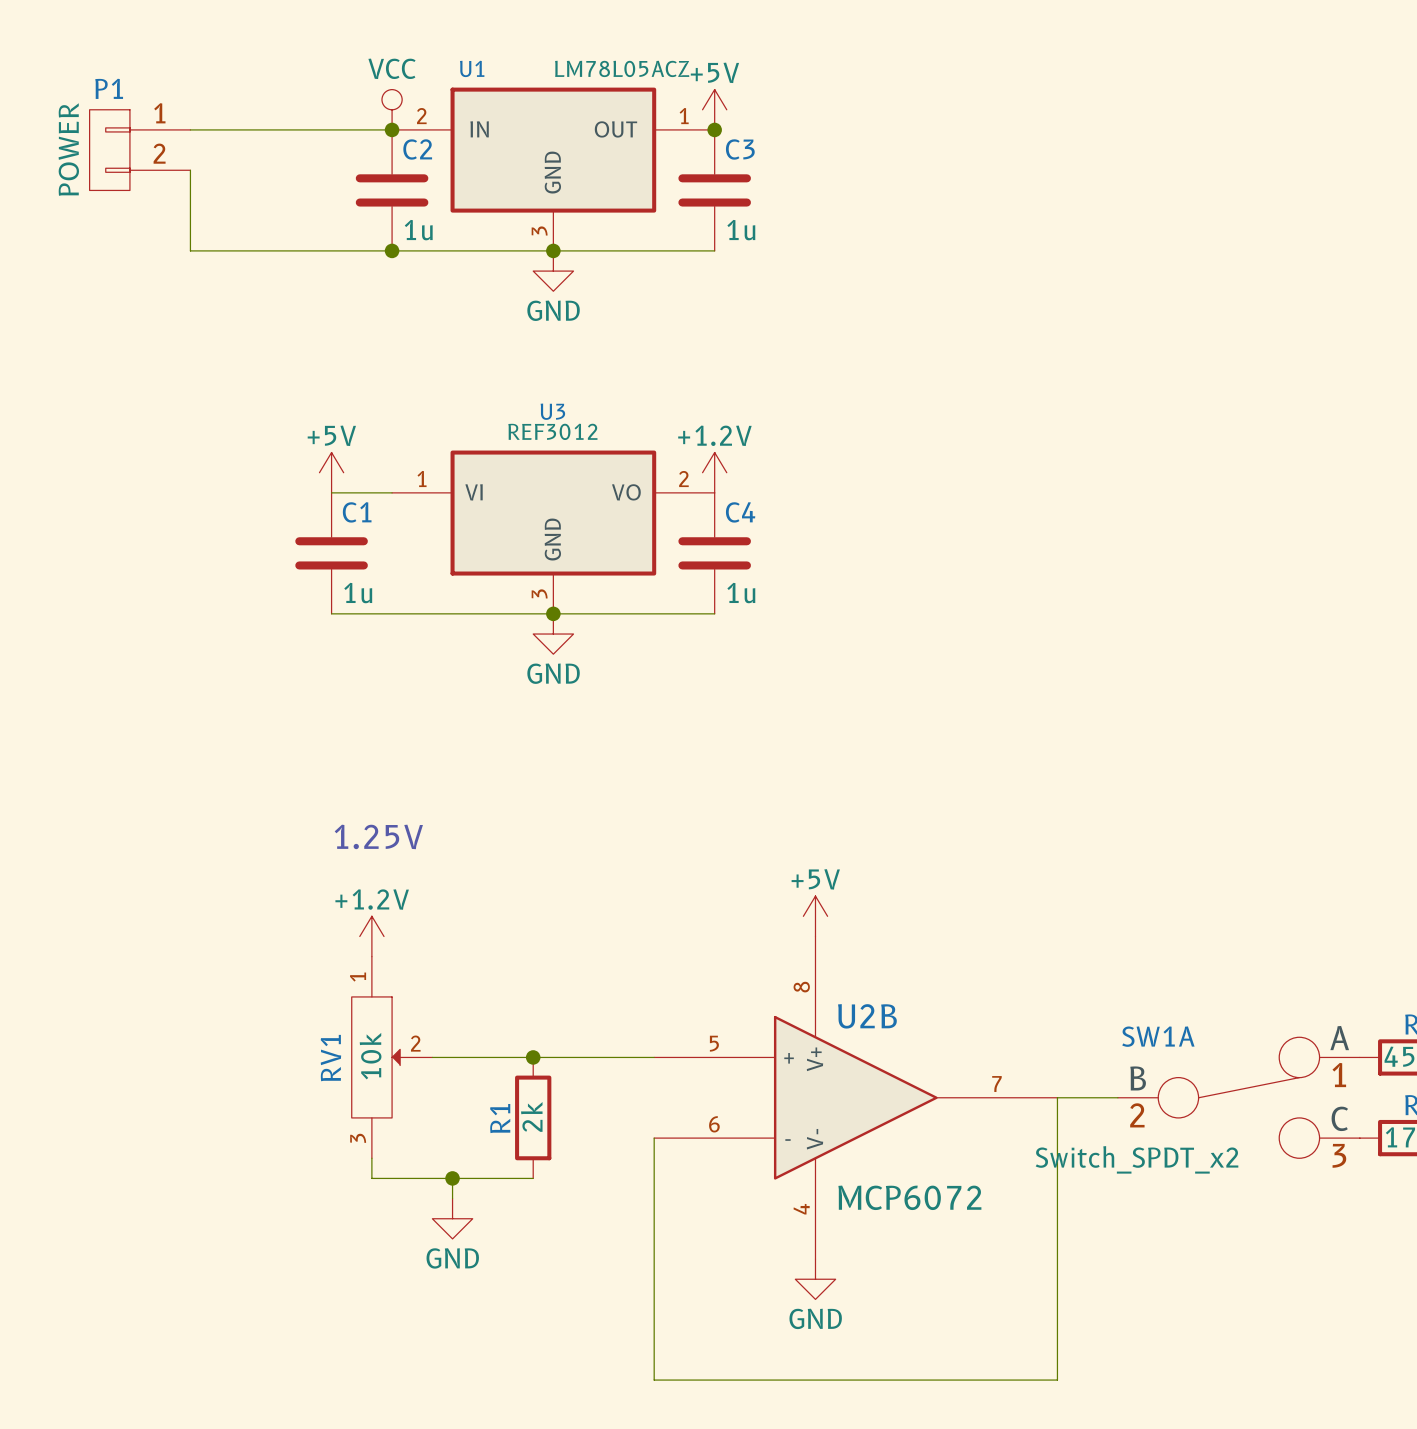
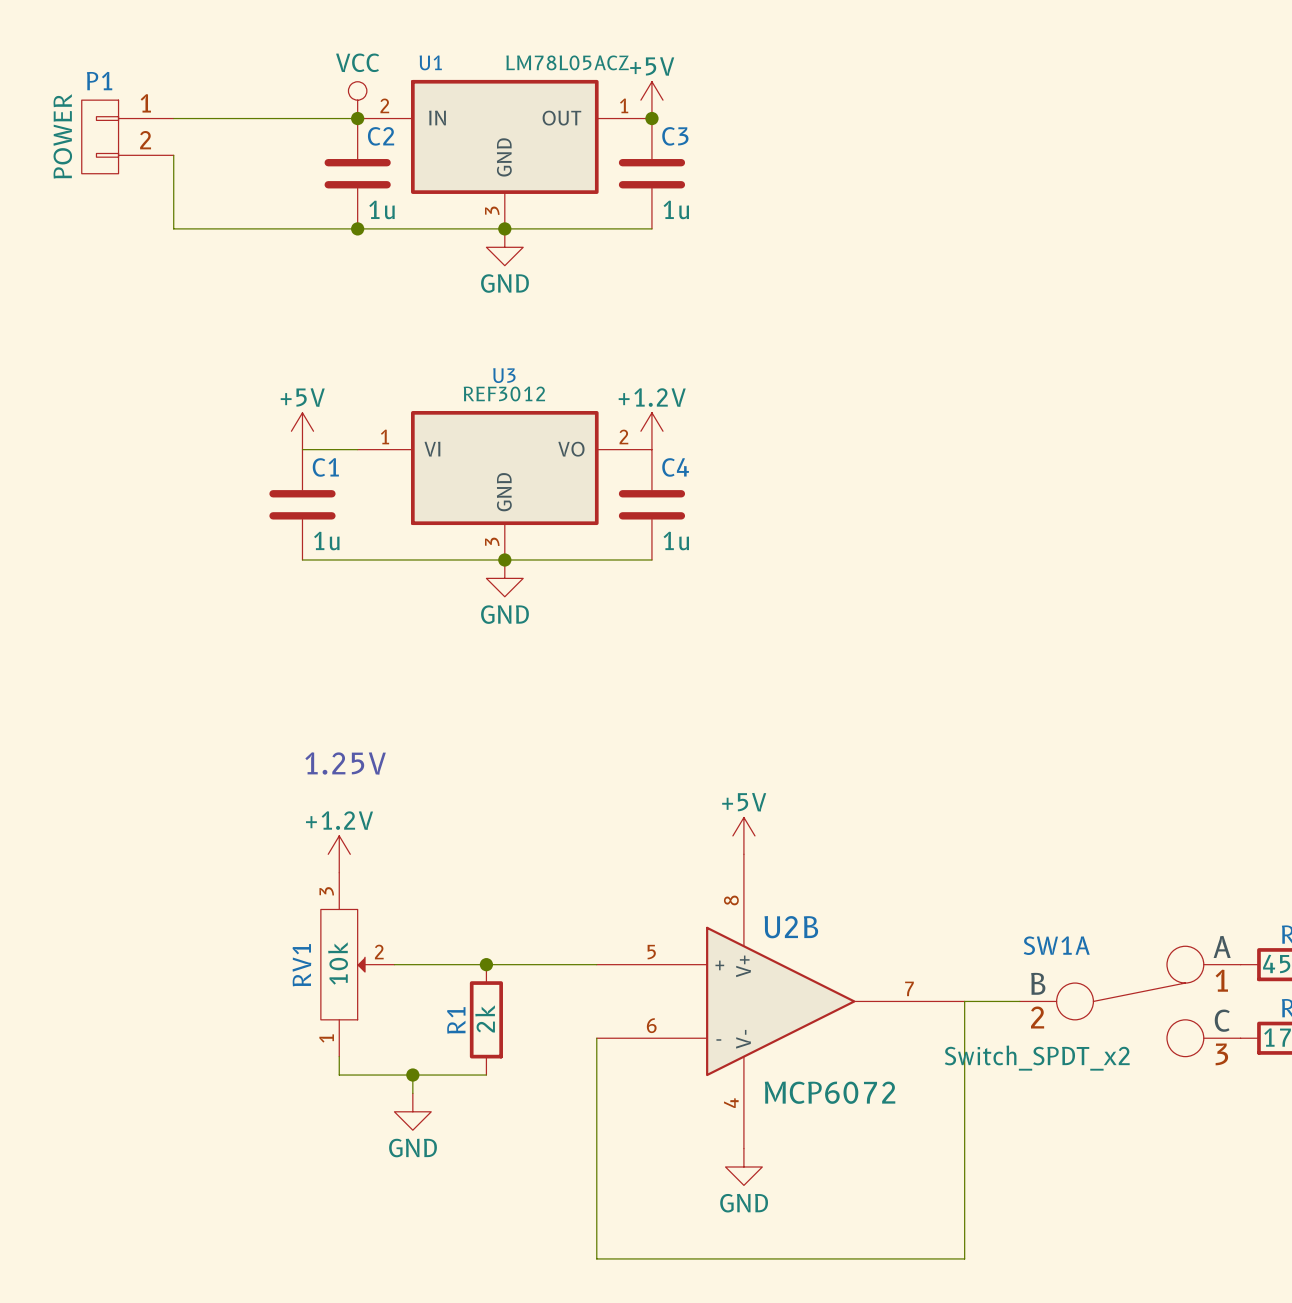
RV1 flip: as is (375, 1057) -> up-down (342, 964)

